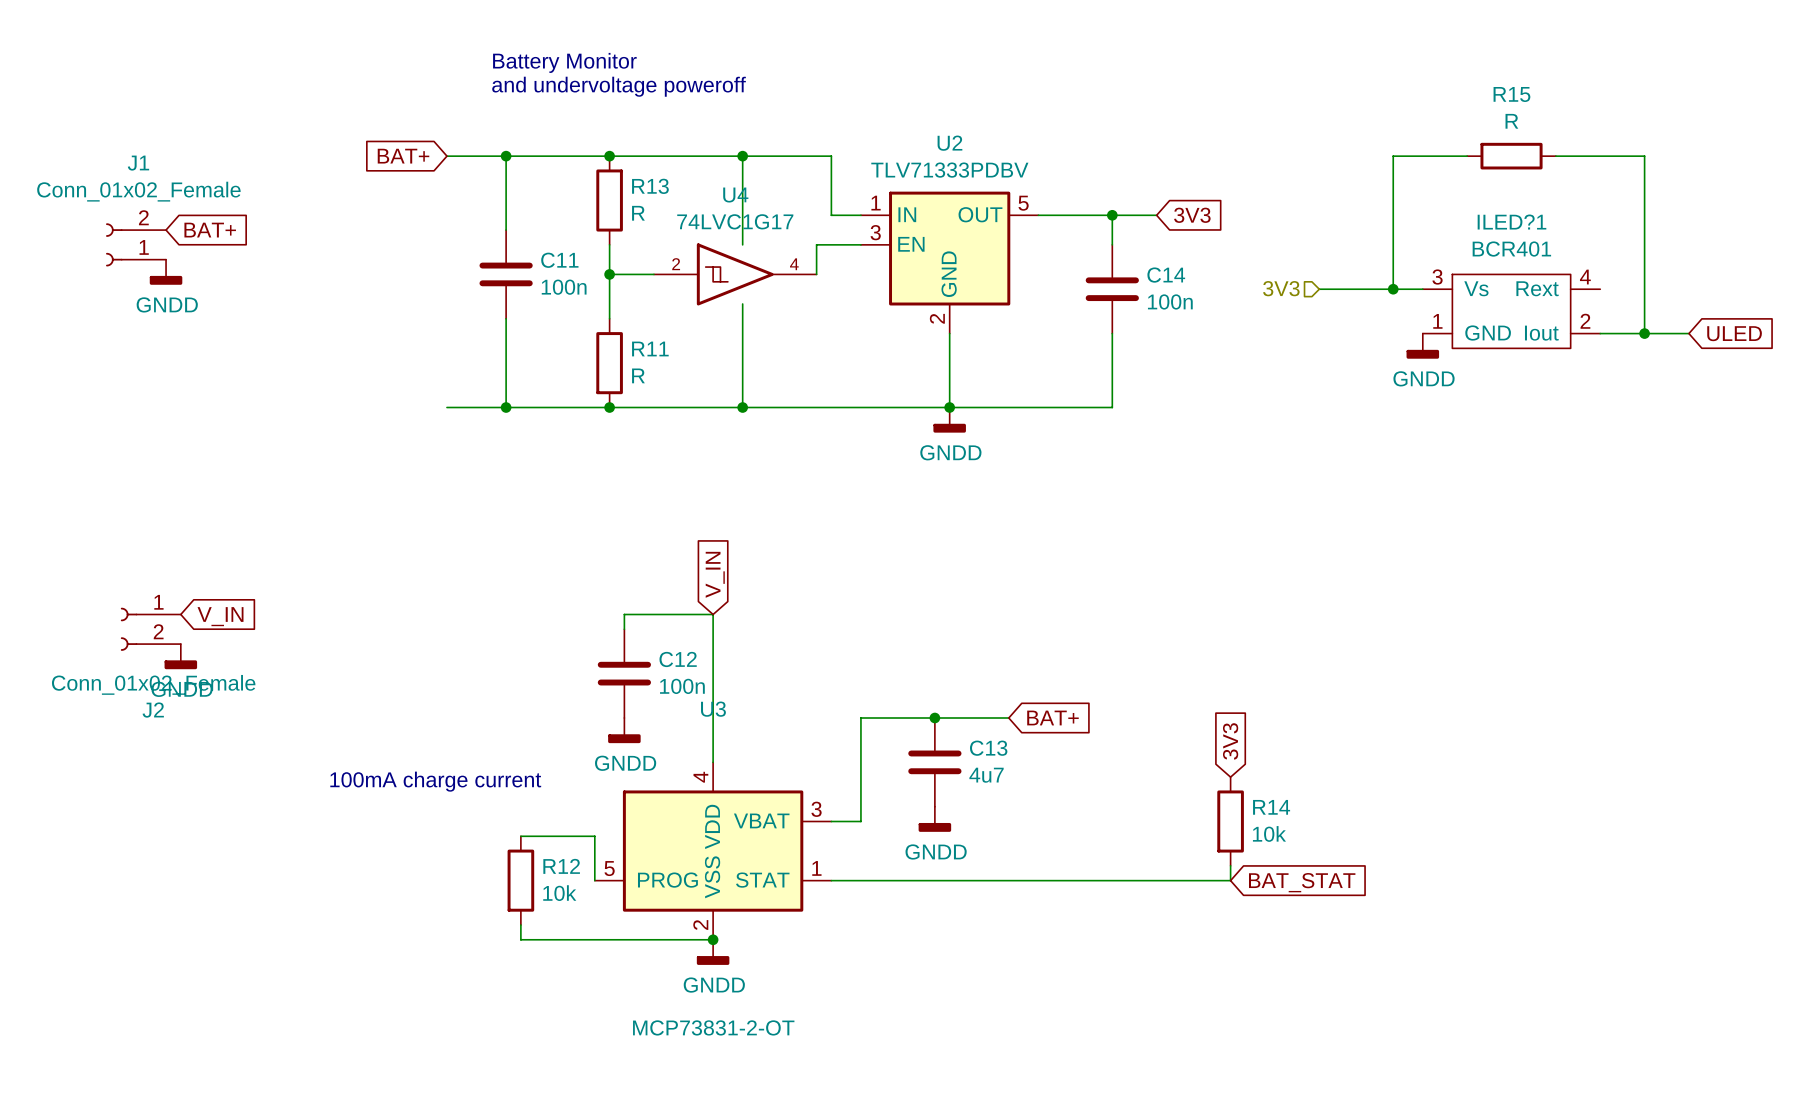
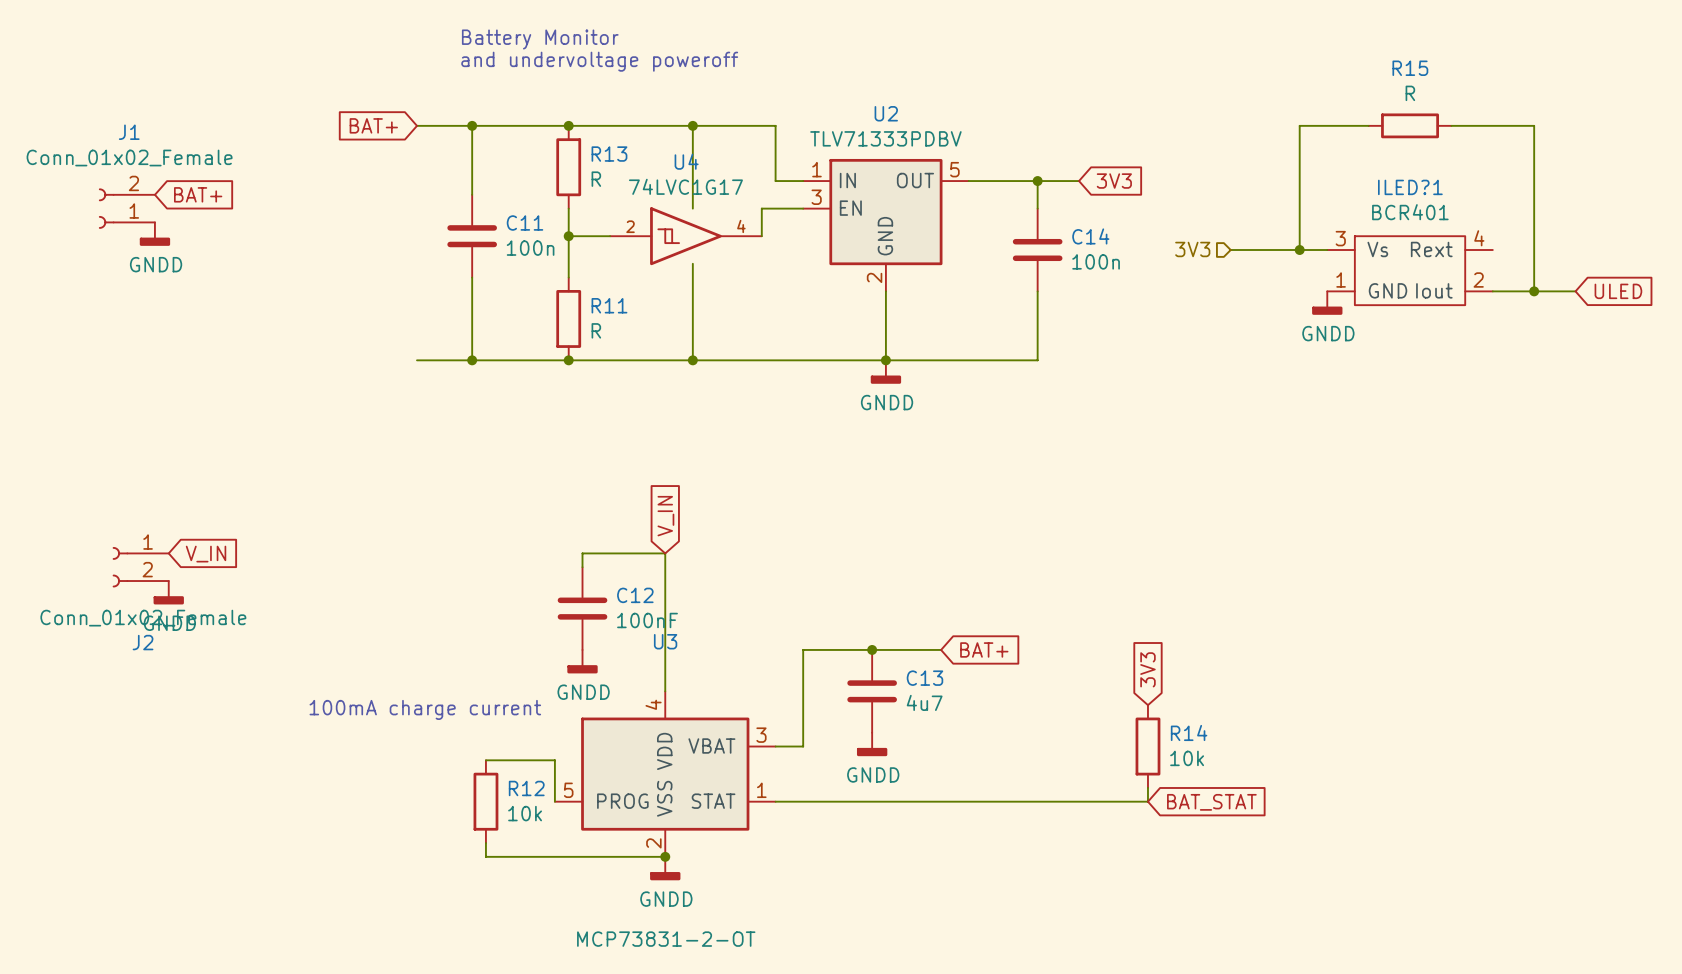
C12 value: 100n (682, 686) -> 100nF (647, 620)

